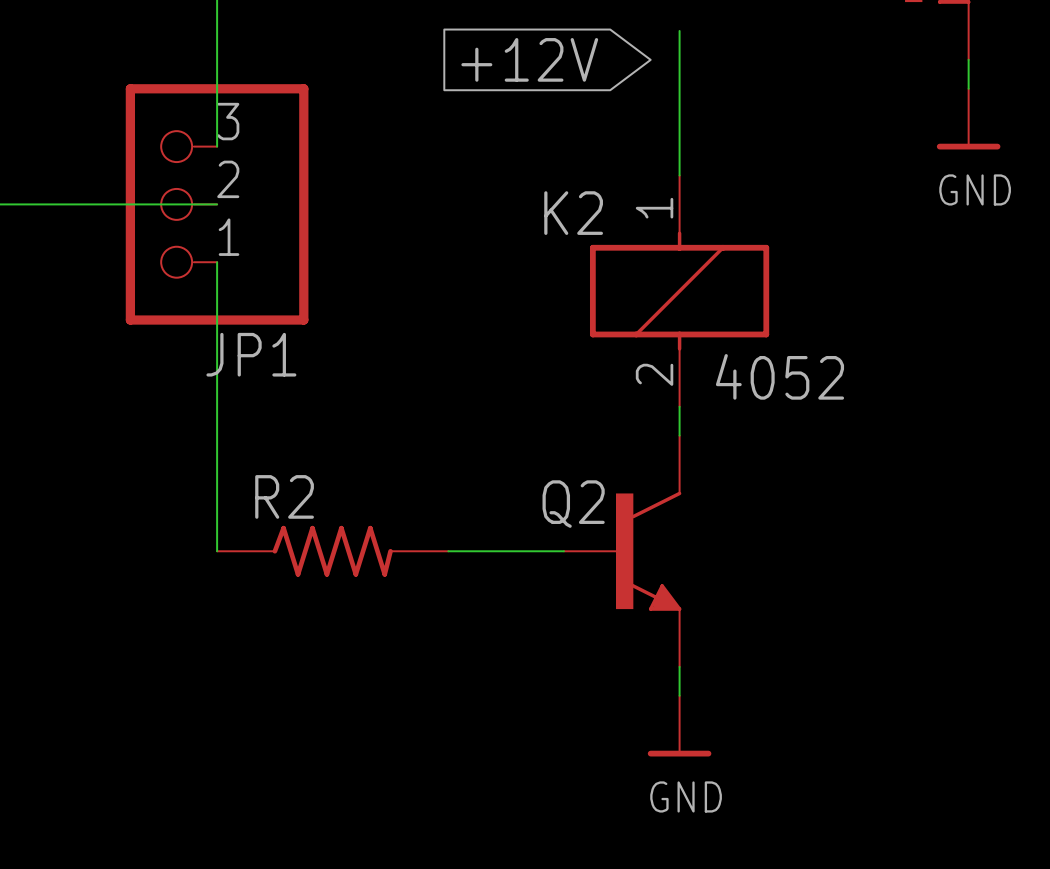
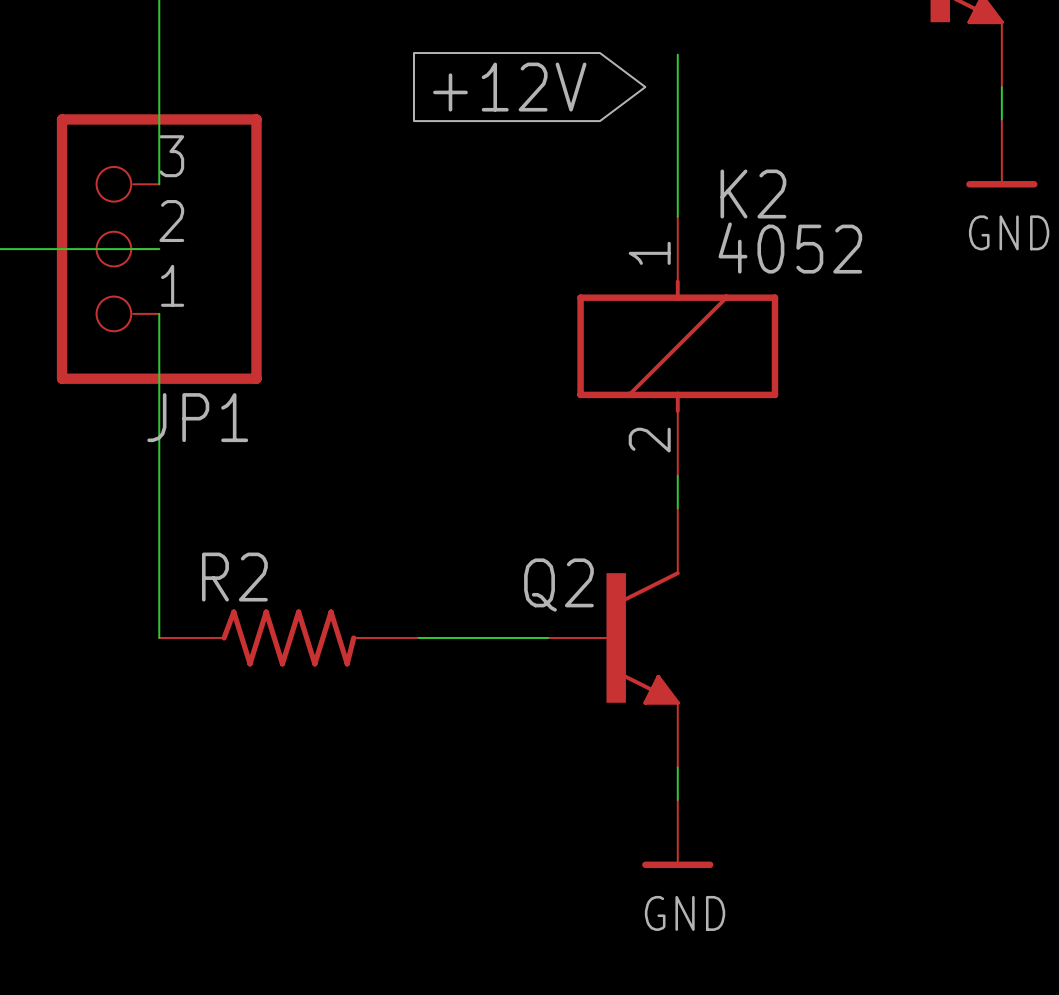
K2 name position: K2 (573, 213) -> K2 (753, 193)
K2 value position: 4052 (779, 376) -> 4052 (790, 248)

